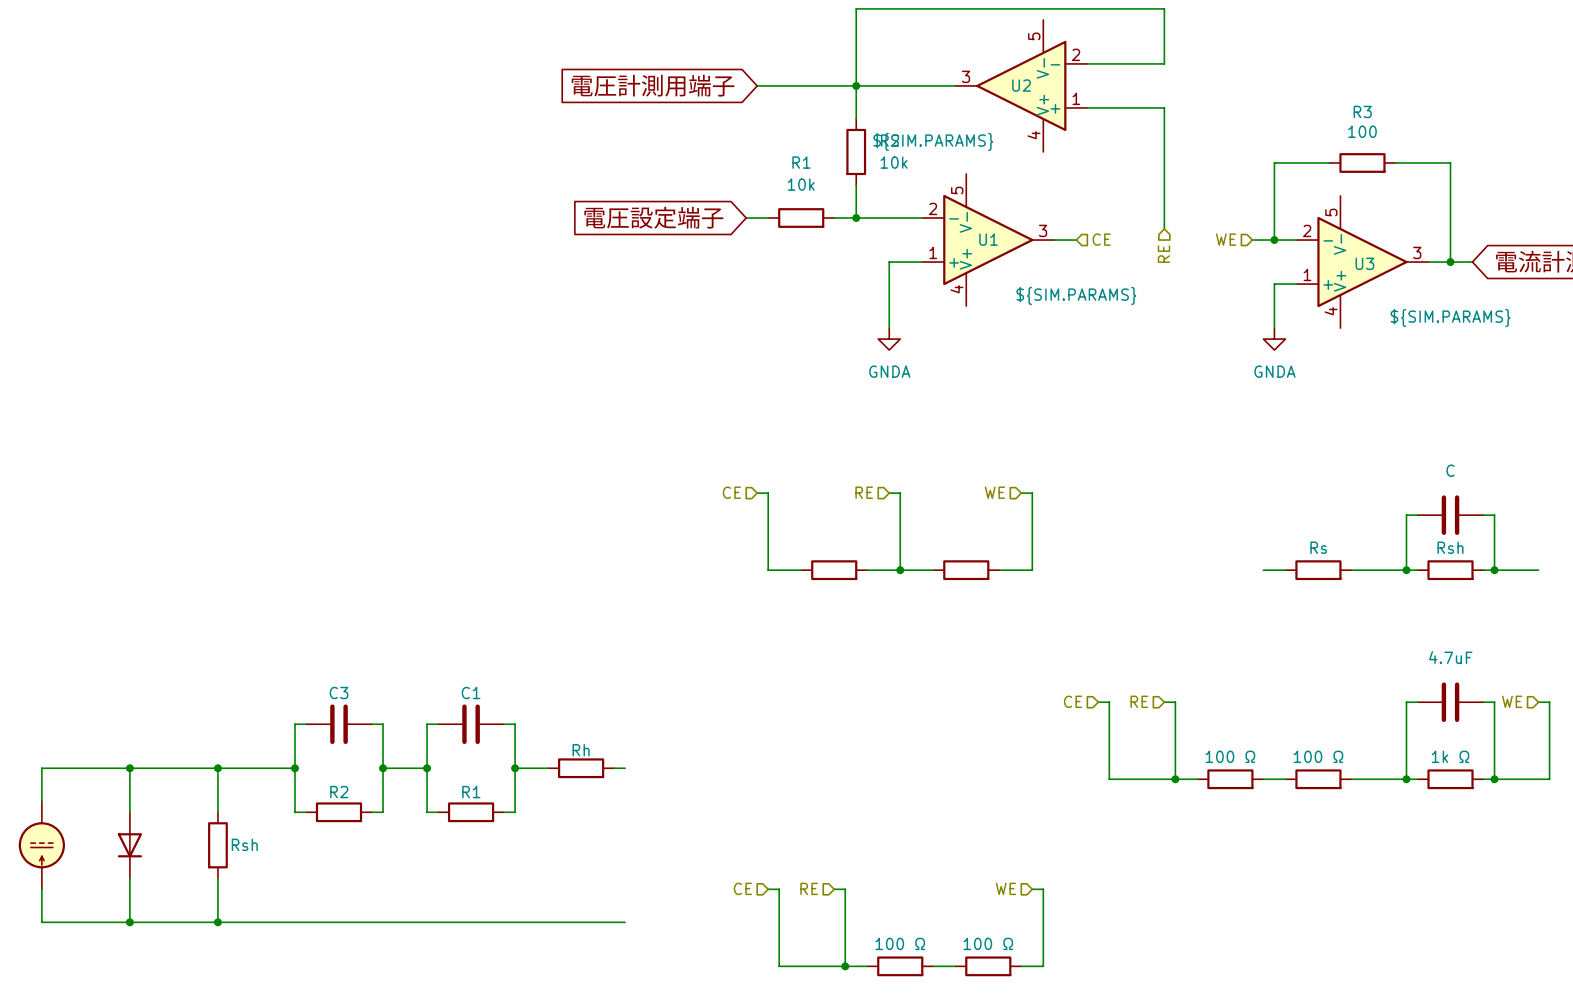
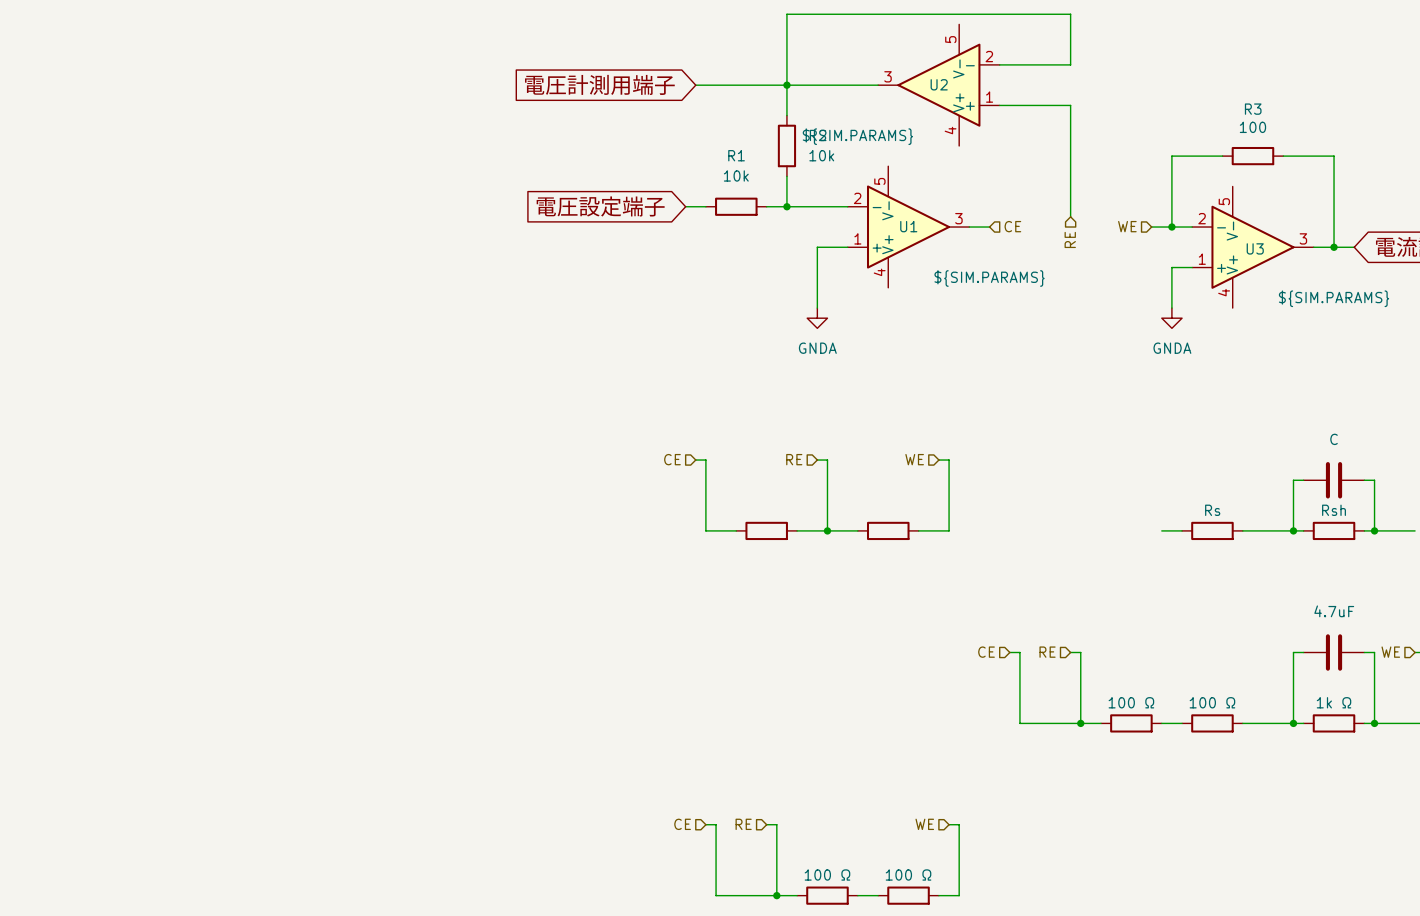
wire: (305, 724) (294, 724) (294, 812) (305, 812) -> none
part: C3 (339, 724) -> none
wire: (372, 724) (383, 724) (383, 812) (372, 812) -> none
wire: (438, 724) (427, 724) (427, 812) (438, 812) -> none
part: C1 (471, 724) -> none
wire: (504, 724) (515, 724) (515, 812) (504, 812) -> none
wire: (129, 768) (129, 812) -> none
junction: (129, 768) -> none
wire: (217, 768) (217, 812) -> none
junction: (217, 768) -> none
wire: (294, 768) (41, 768) (41, 801) -> none
junction: (294, 768) -> none
wire: (383, 768) (427, 768) -> none
junction: (383, 768) -> none
junction: (427, 768) -> none
wire: (515, 768) (548, 768) -> none
junction: (515, 768) -> none
part: Rh (581, 768) -> none
wire: (614, 768) (625, 768) -> none
part: R2 (339, 812) -> none
part: R1 (471, 812) -> none
part: (41, 845) -> none
part: (129, 845) -> none
part: Rsh (217, 845) -> none
wire: (129, 878) (129, 922) -> none
wire: (217, 878) (217, 922) -> none
wire: (41, 889) (41, 922) (625, 922) -> none
junction: (129, 922) -> none
junction: (217, 922) -> none

